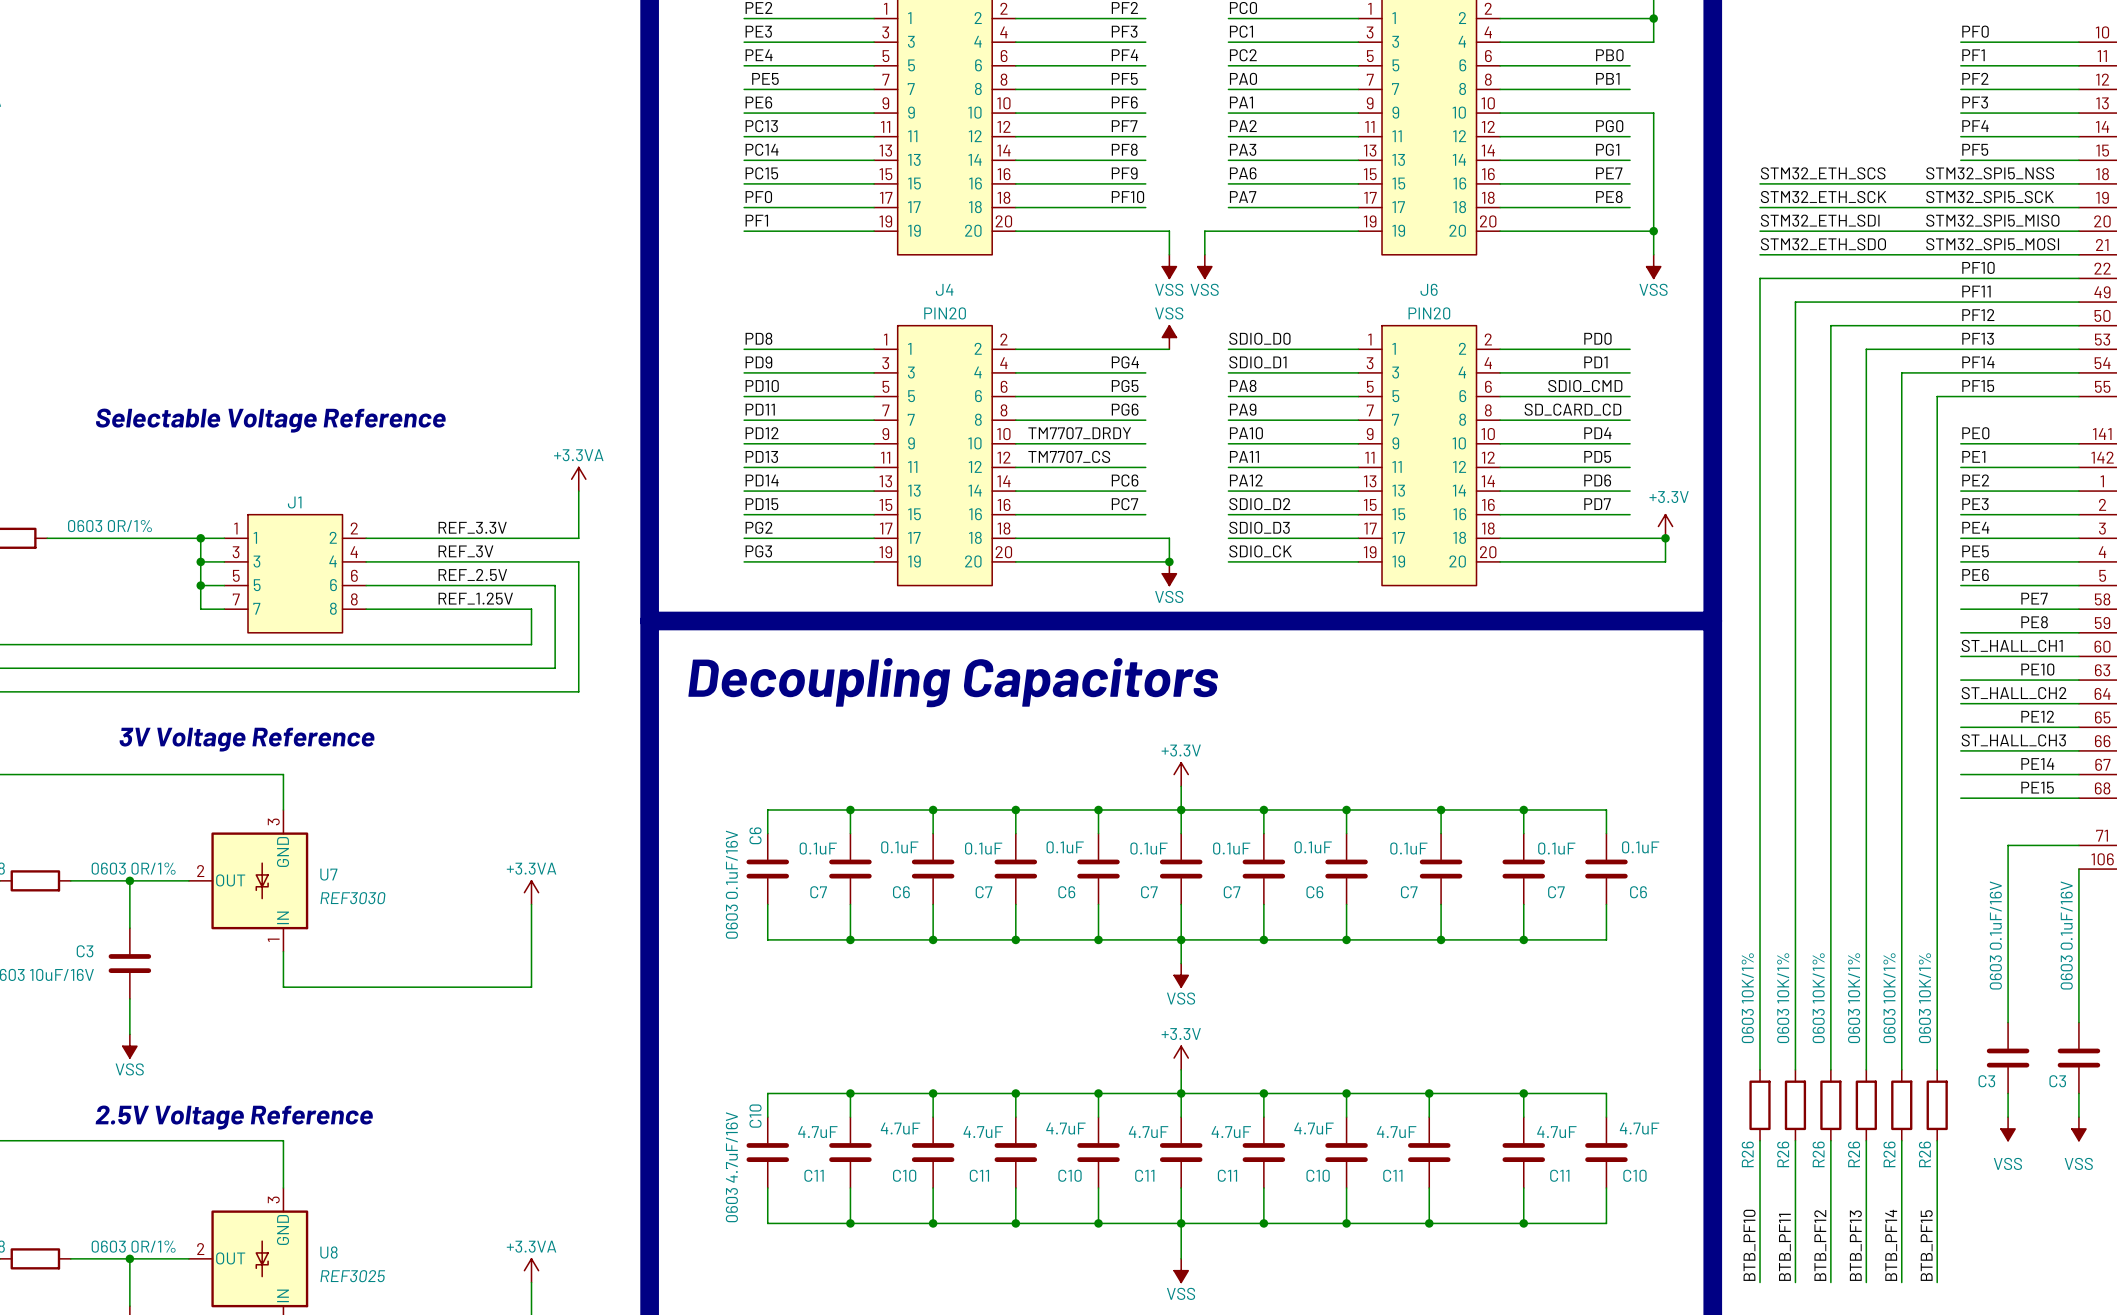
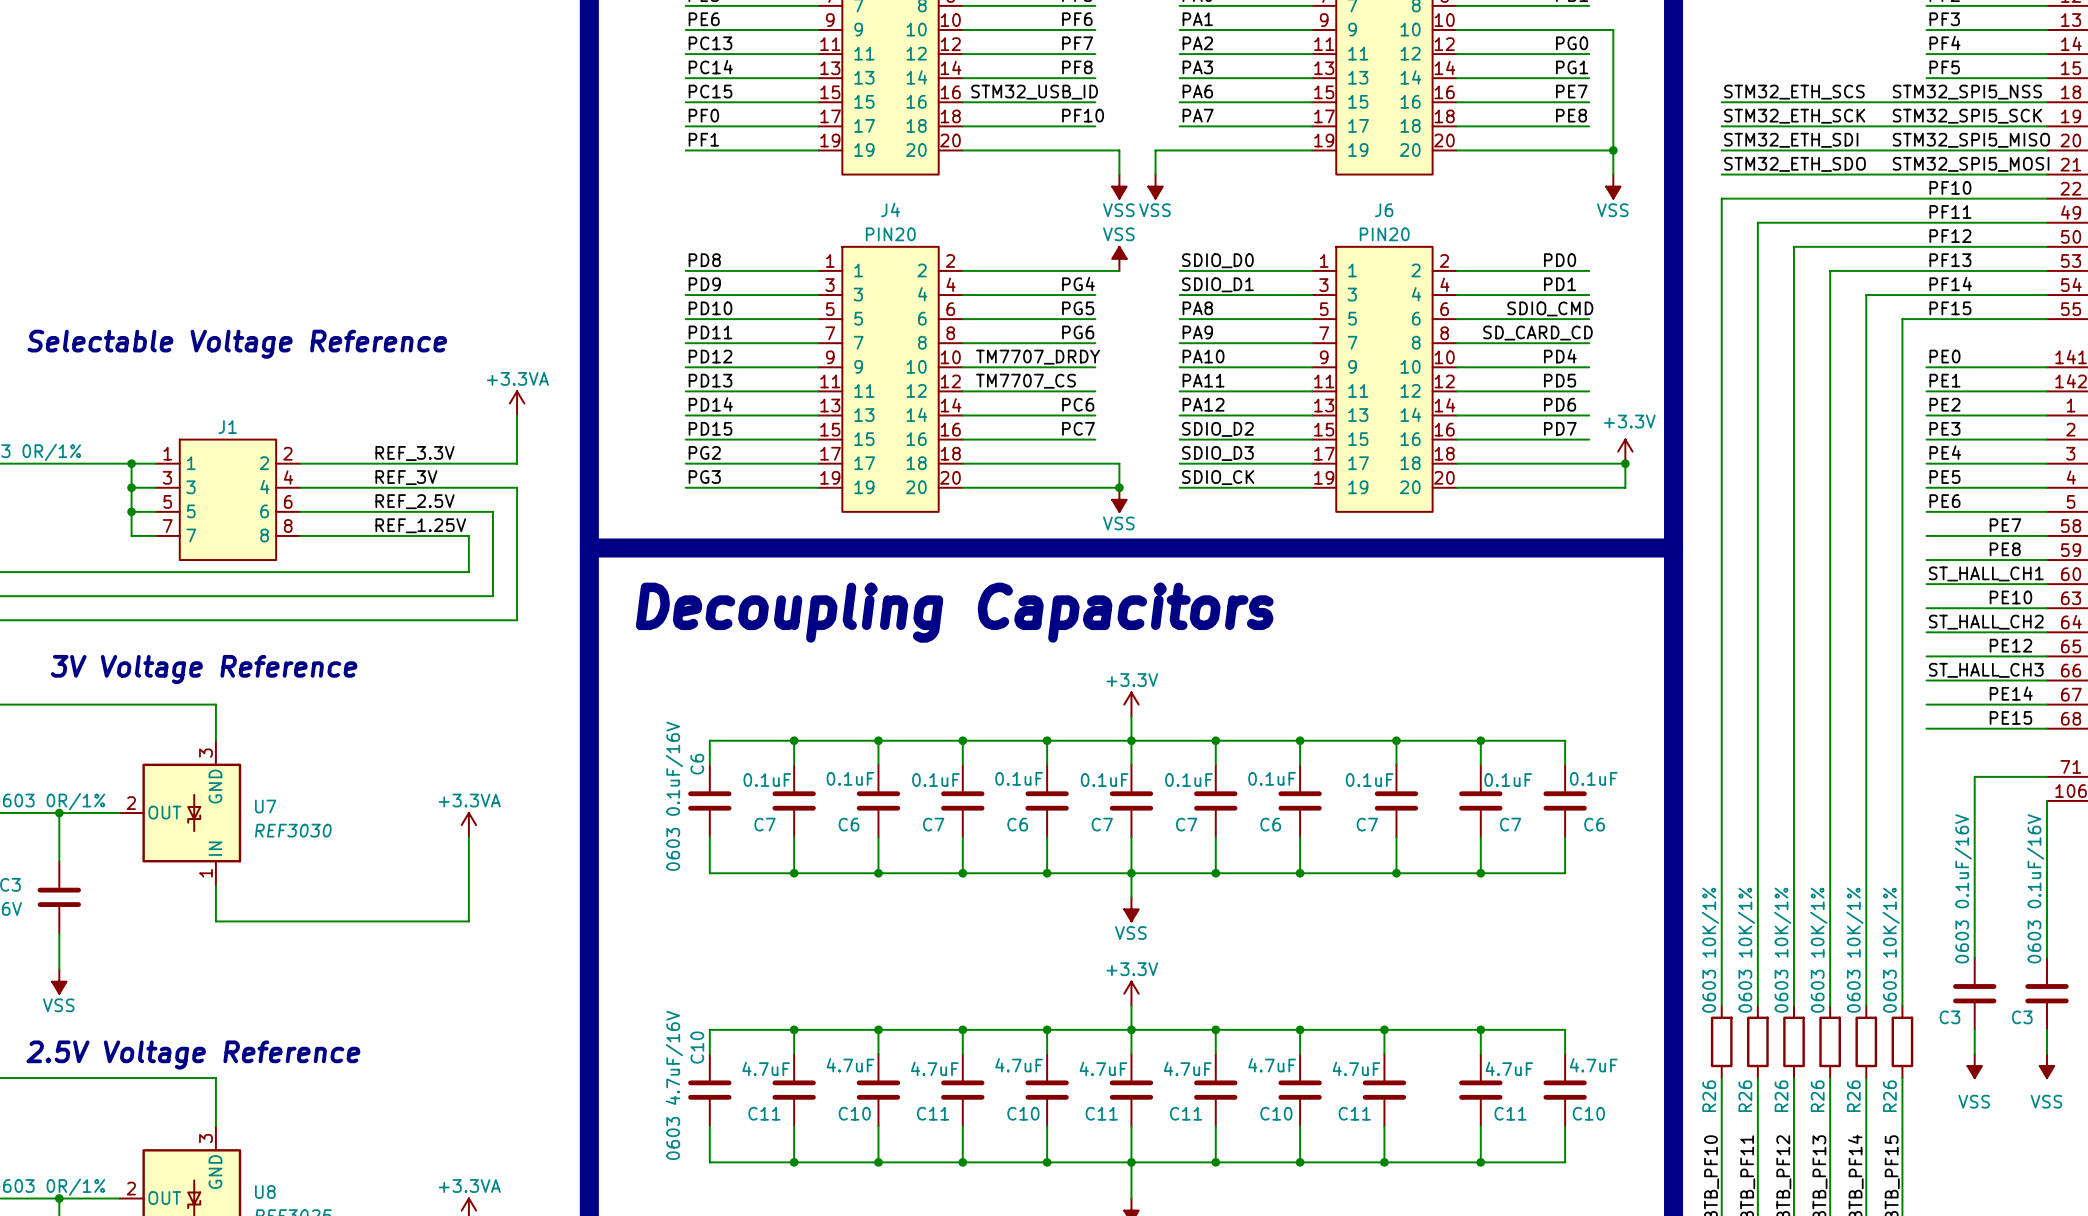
label: none -> STM32_USB_ID (1034, 92)
label: PF9 (1124, 173) -> none

